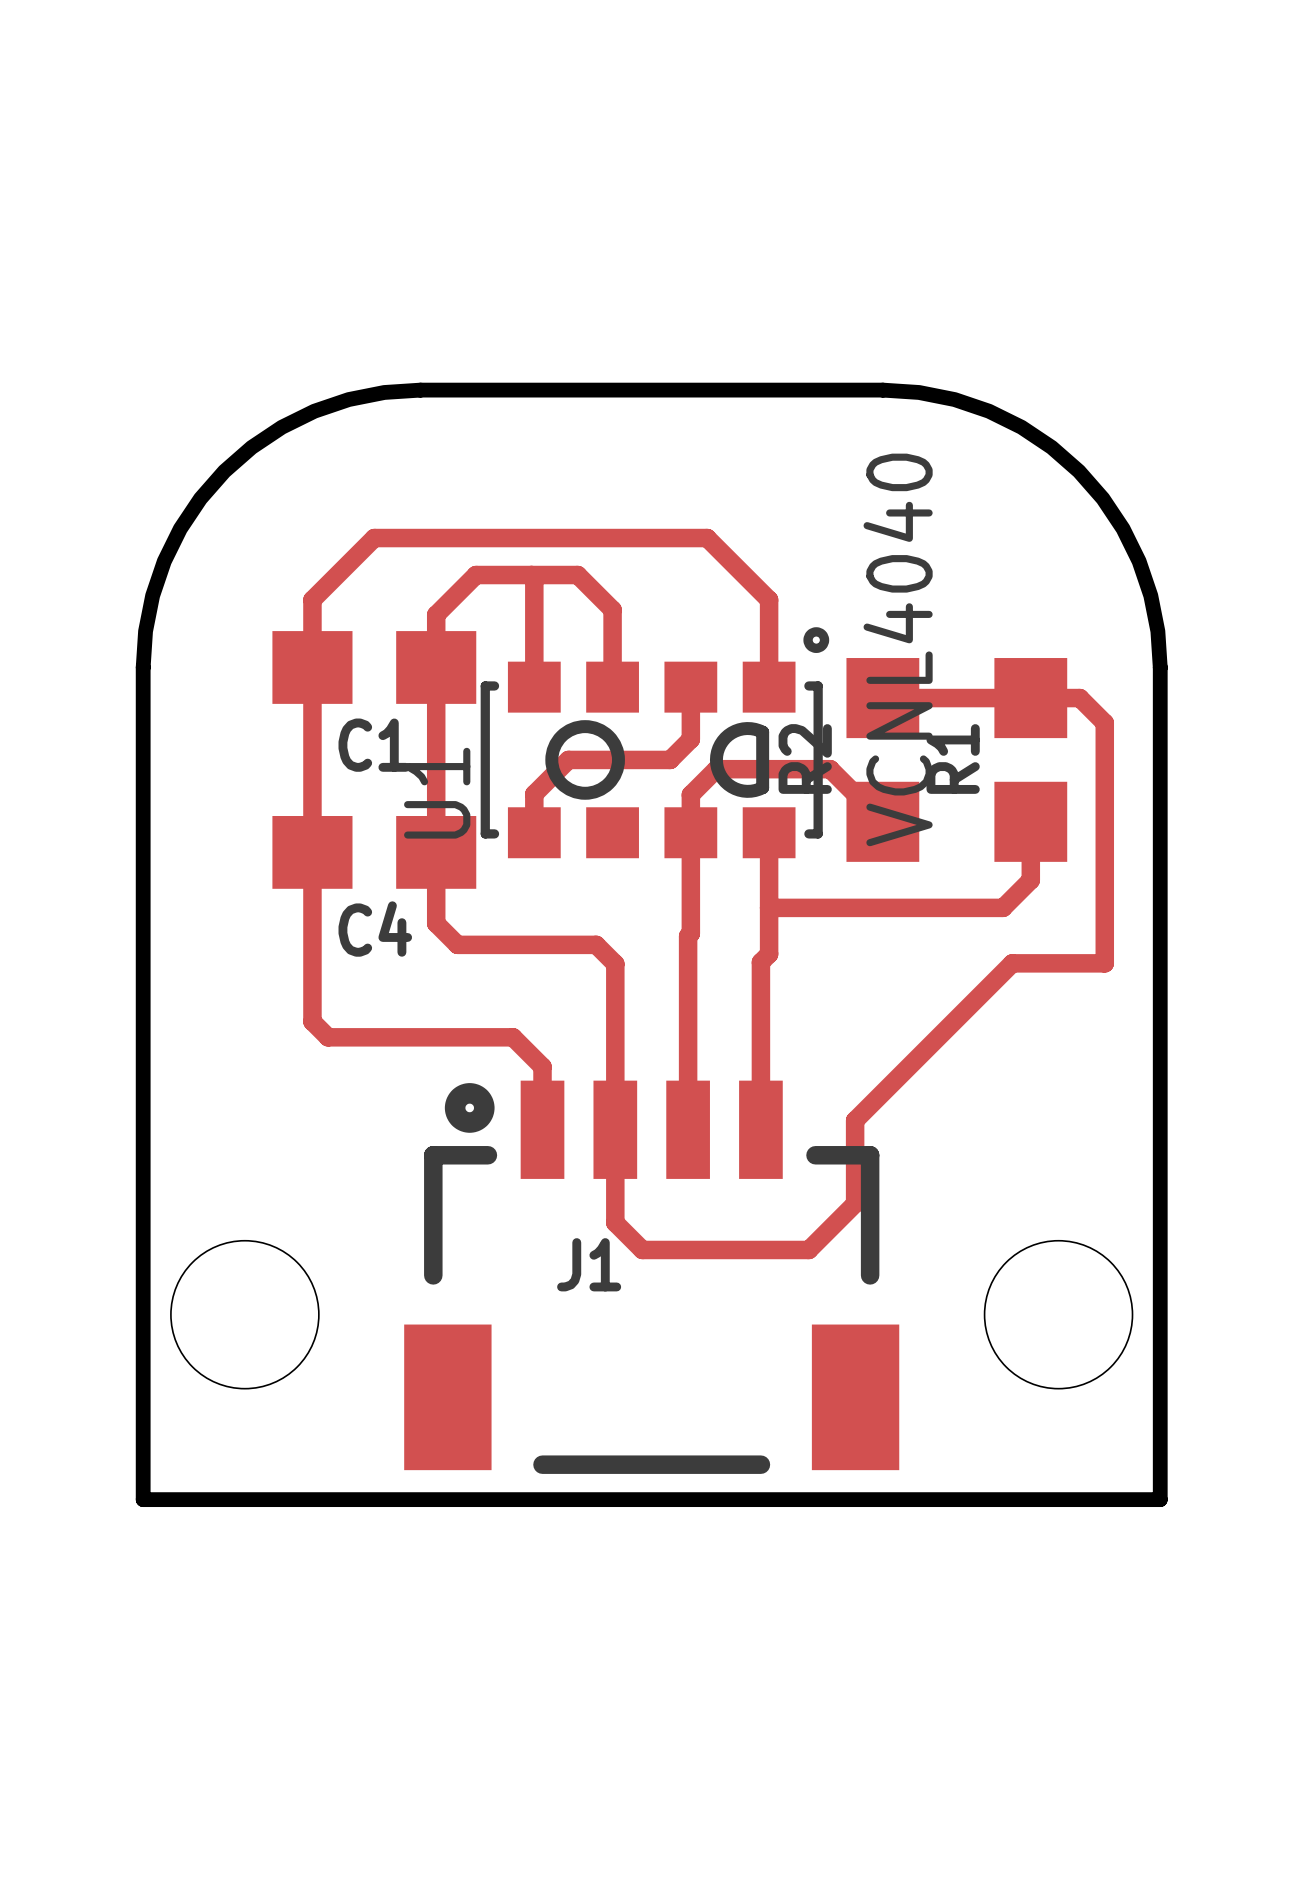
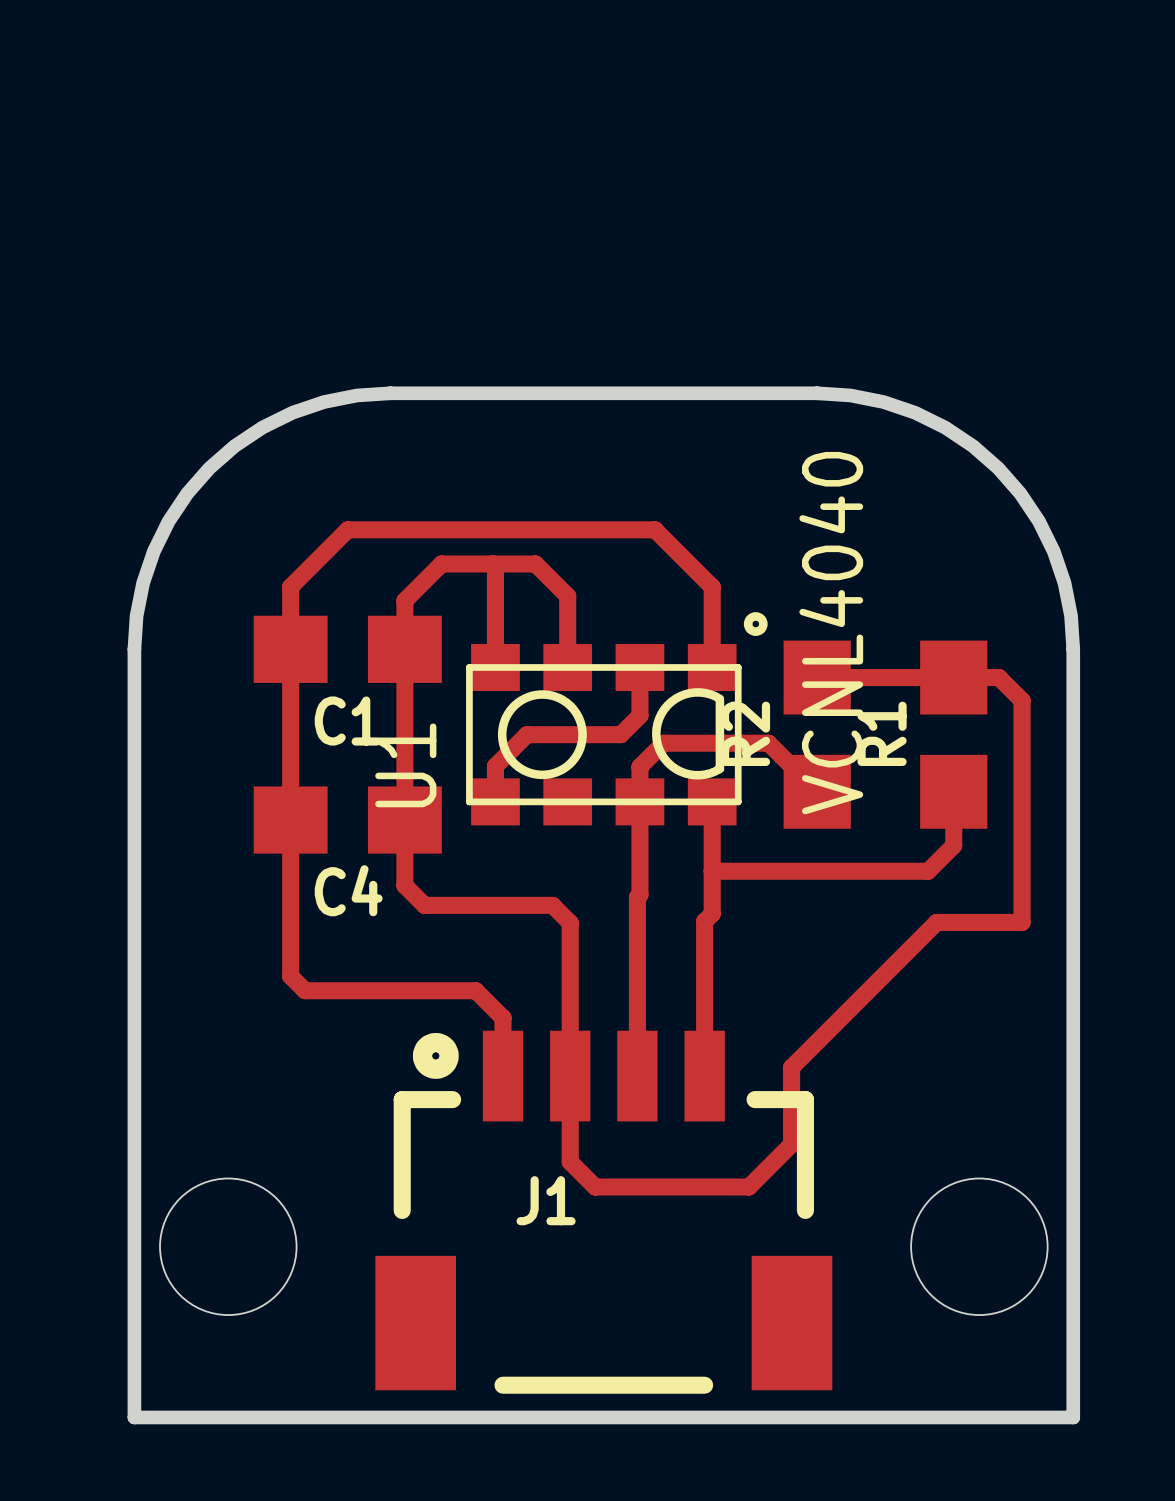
U1 footprint: [480, 627, 830, 859] -> [466, 612, 768, 826]

